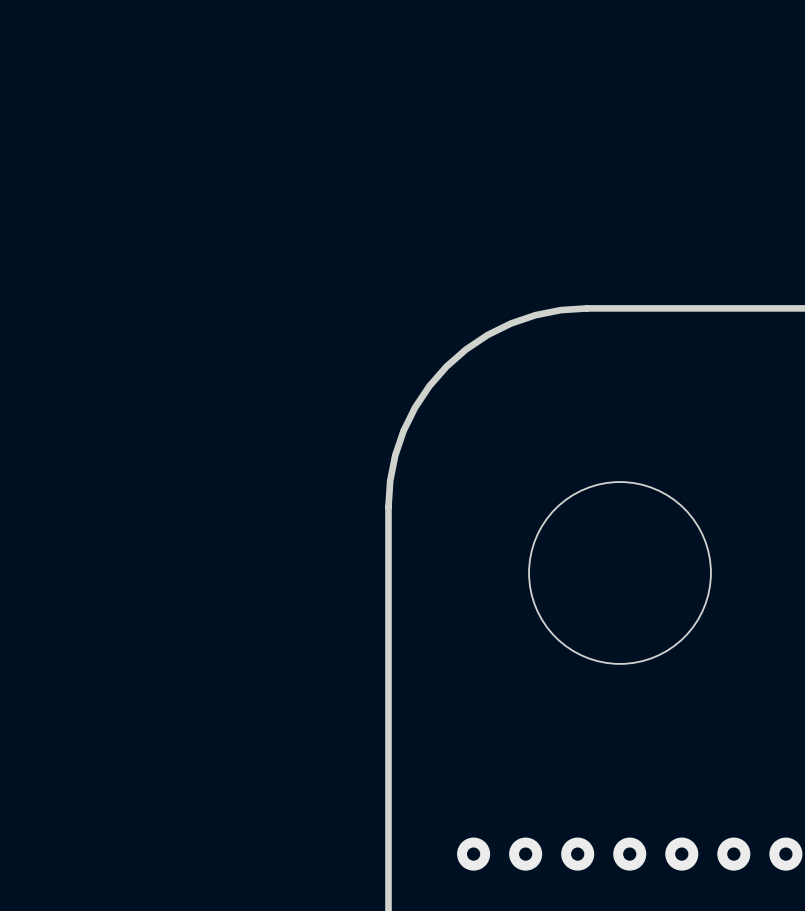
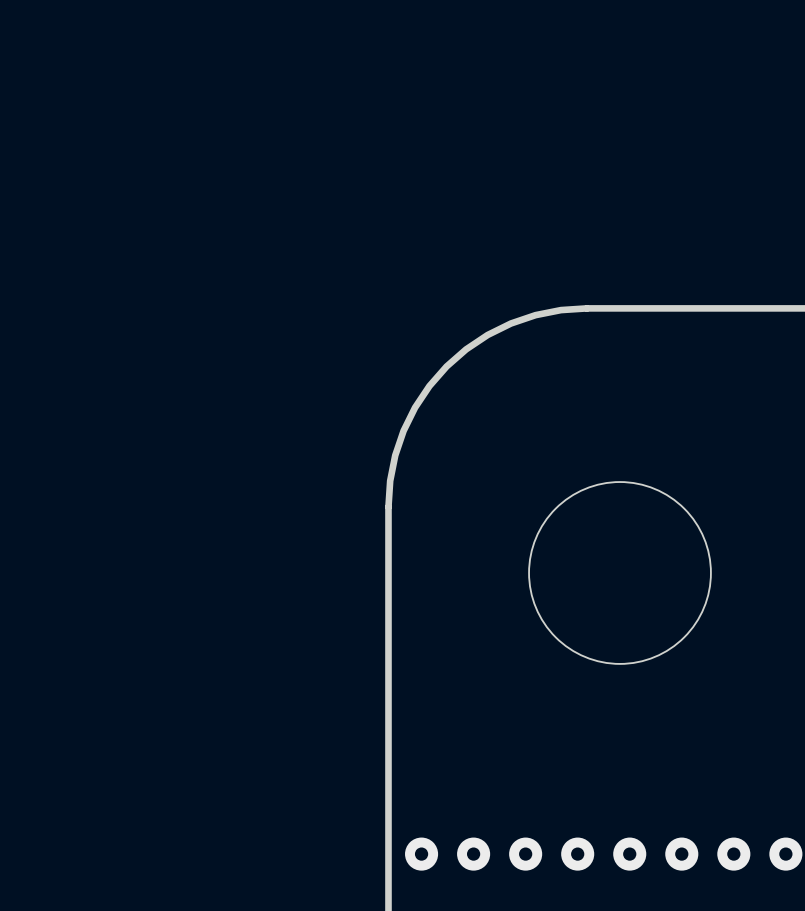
via: none -> (421, 854)

